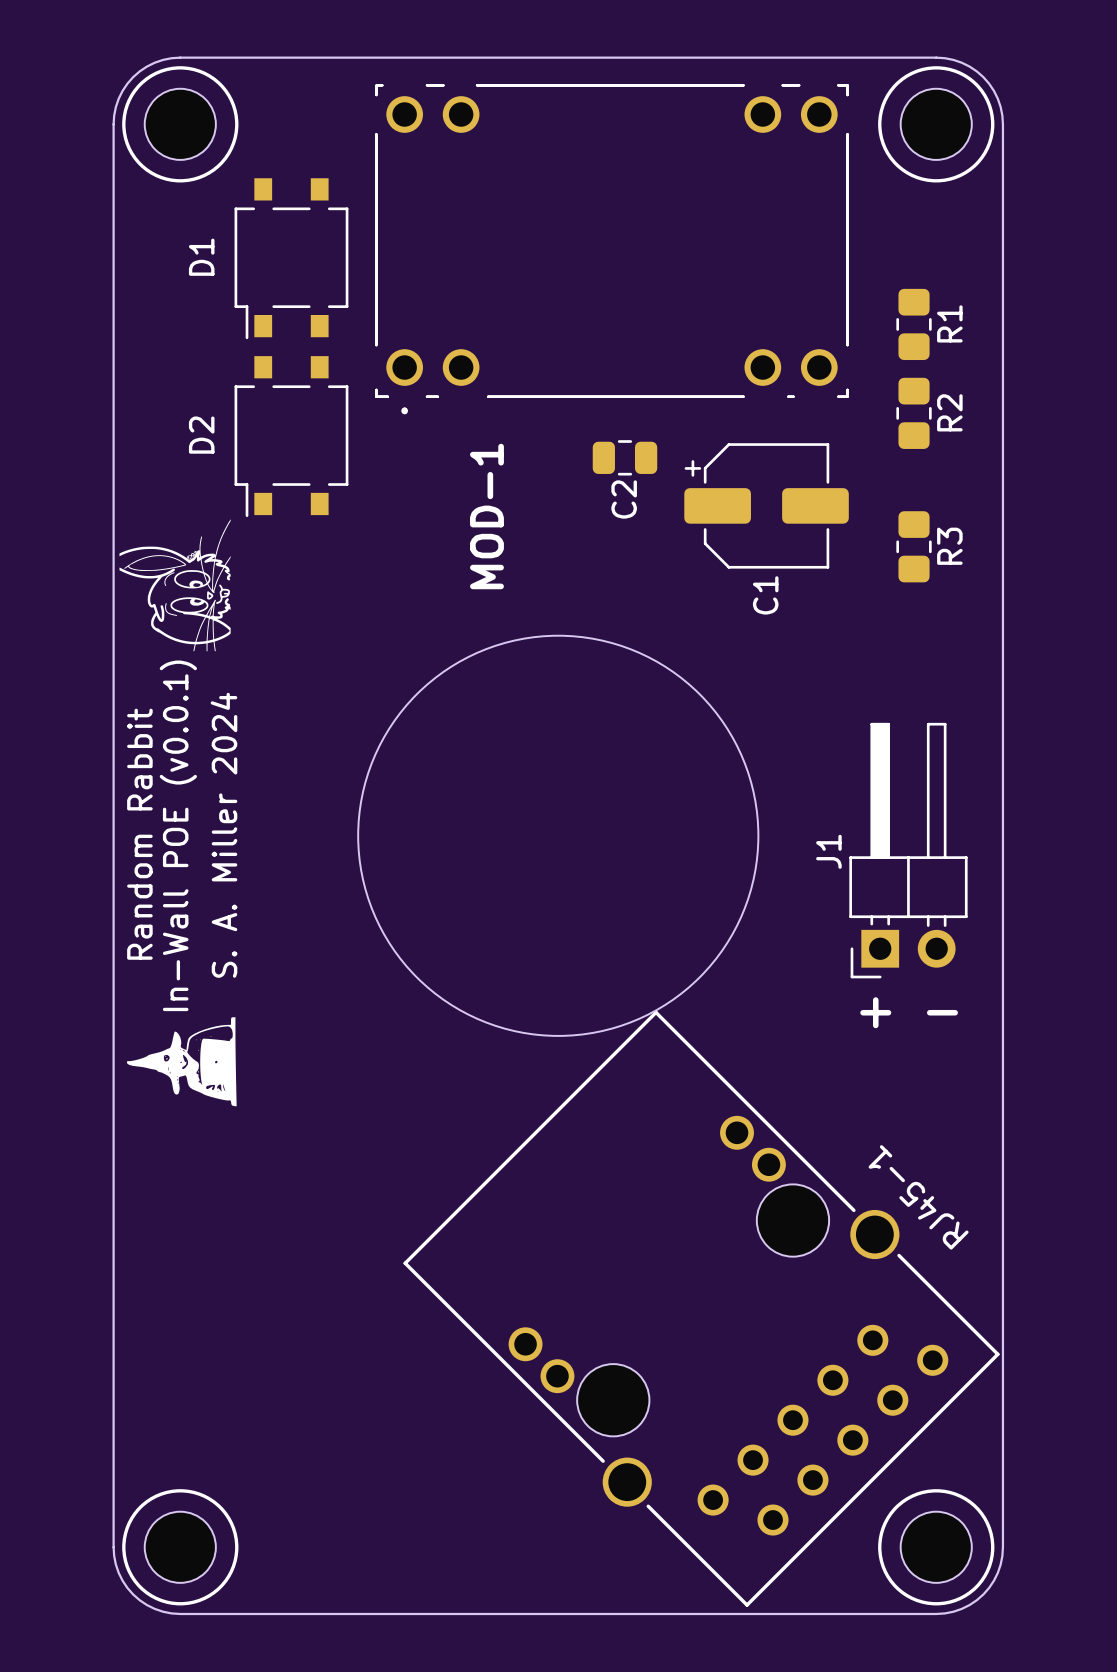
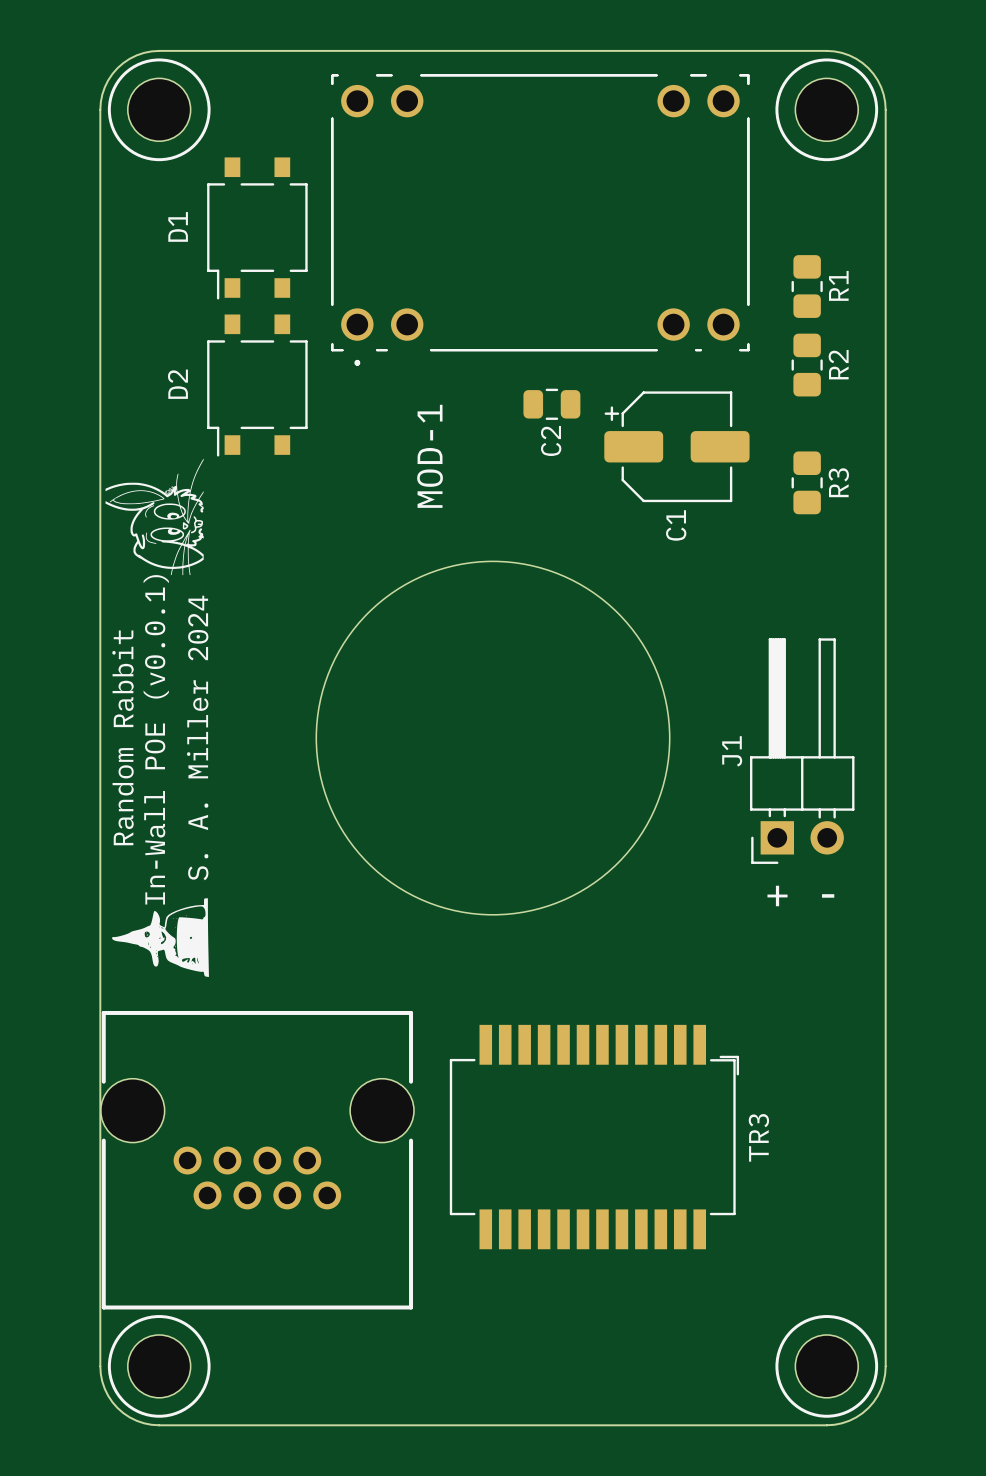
TR3: none -> (594, 1137)
RJ45-1: (701, 1308) -> none
part: none -> (257, 1160)

